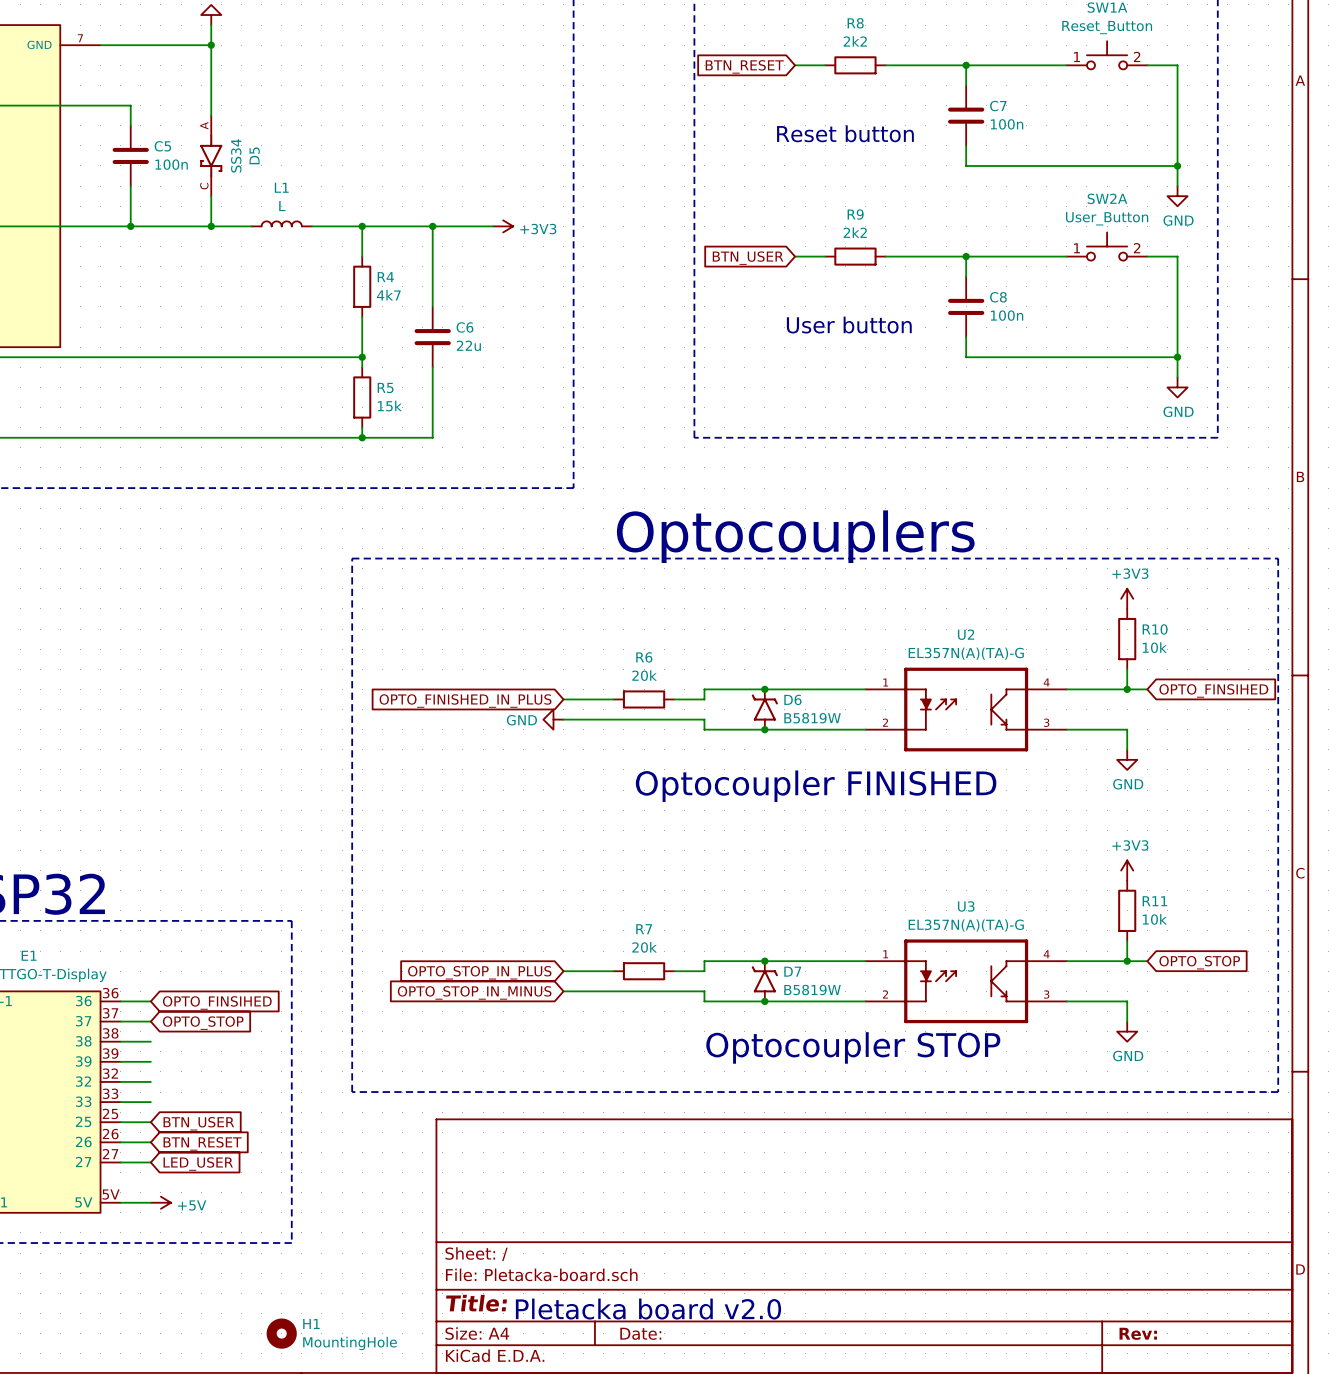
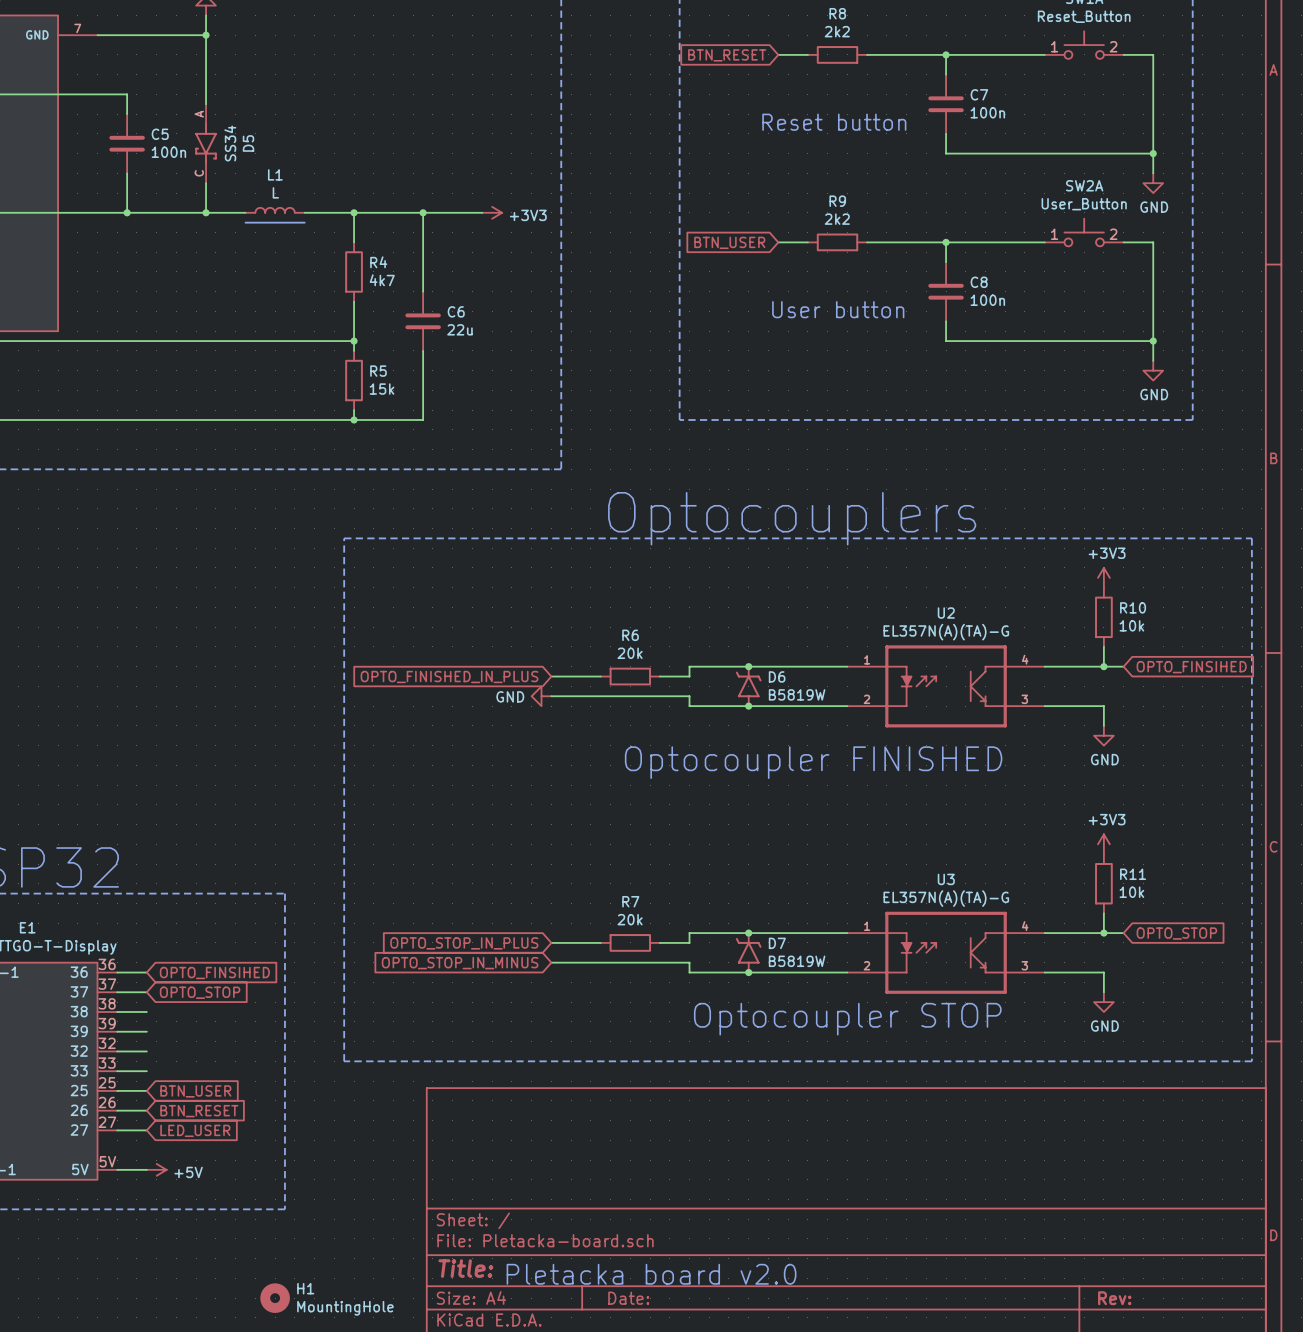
bus: none -> (245, 222) (304, 222)

